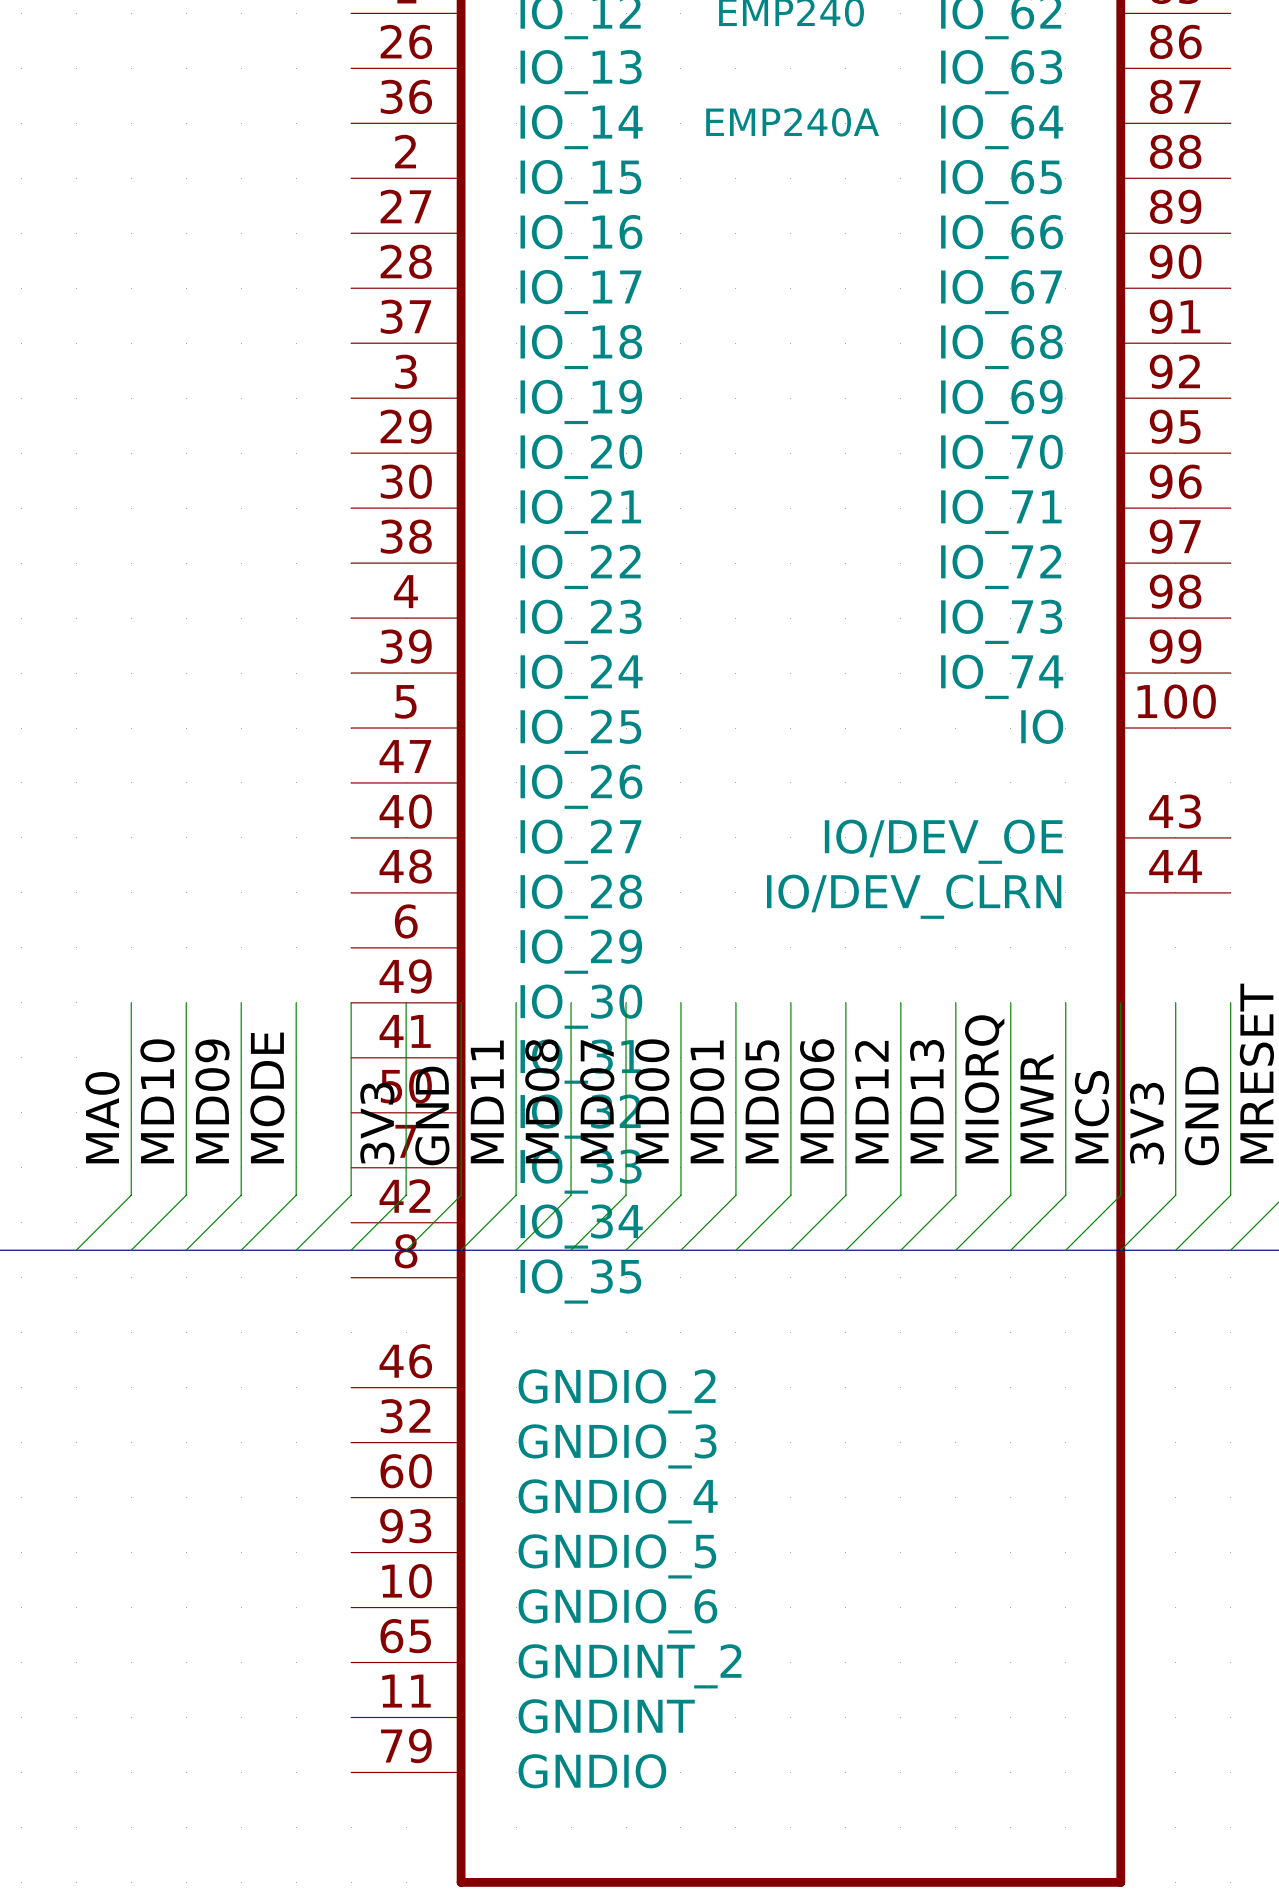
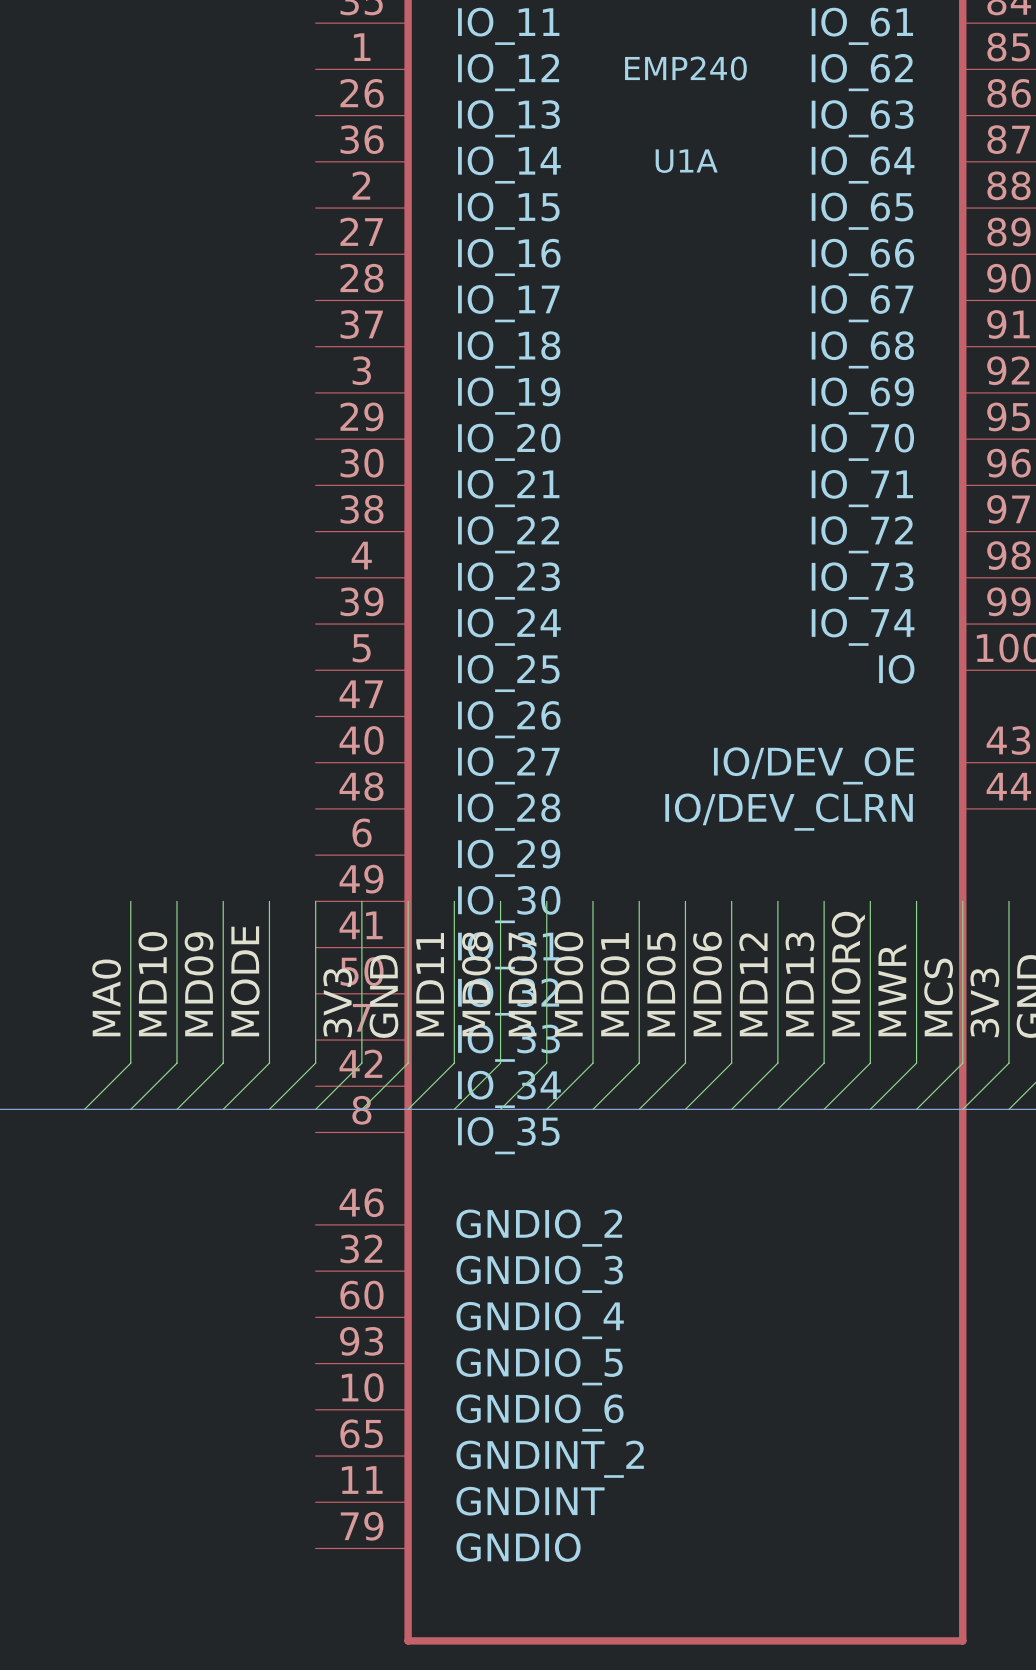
EMP240A name: EMP240A (792, 122) -> U1A (686, 161)

